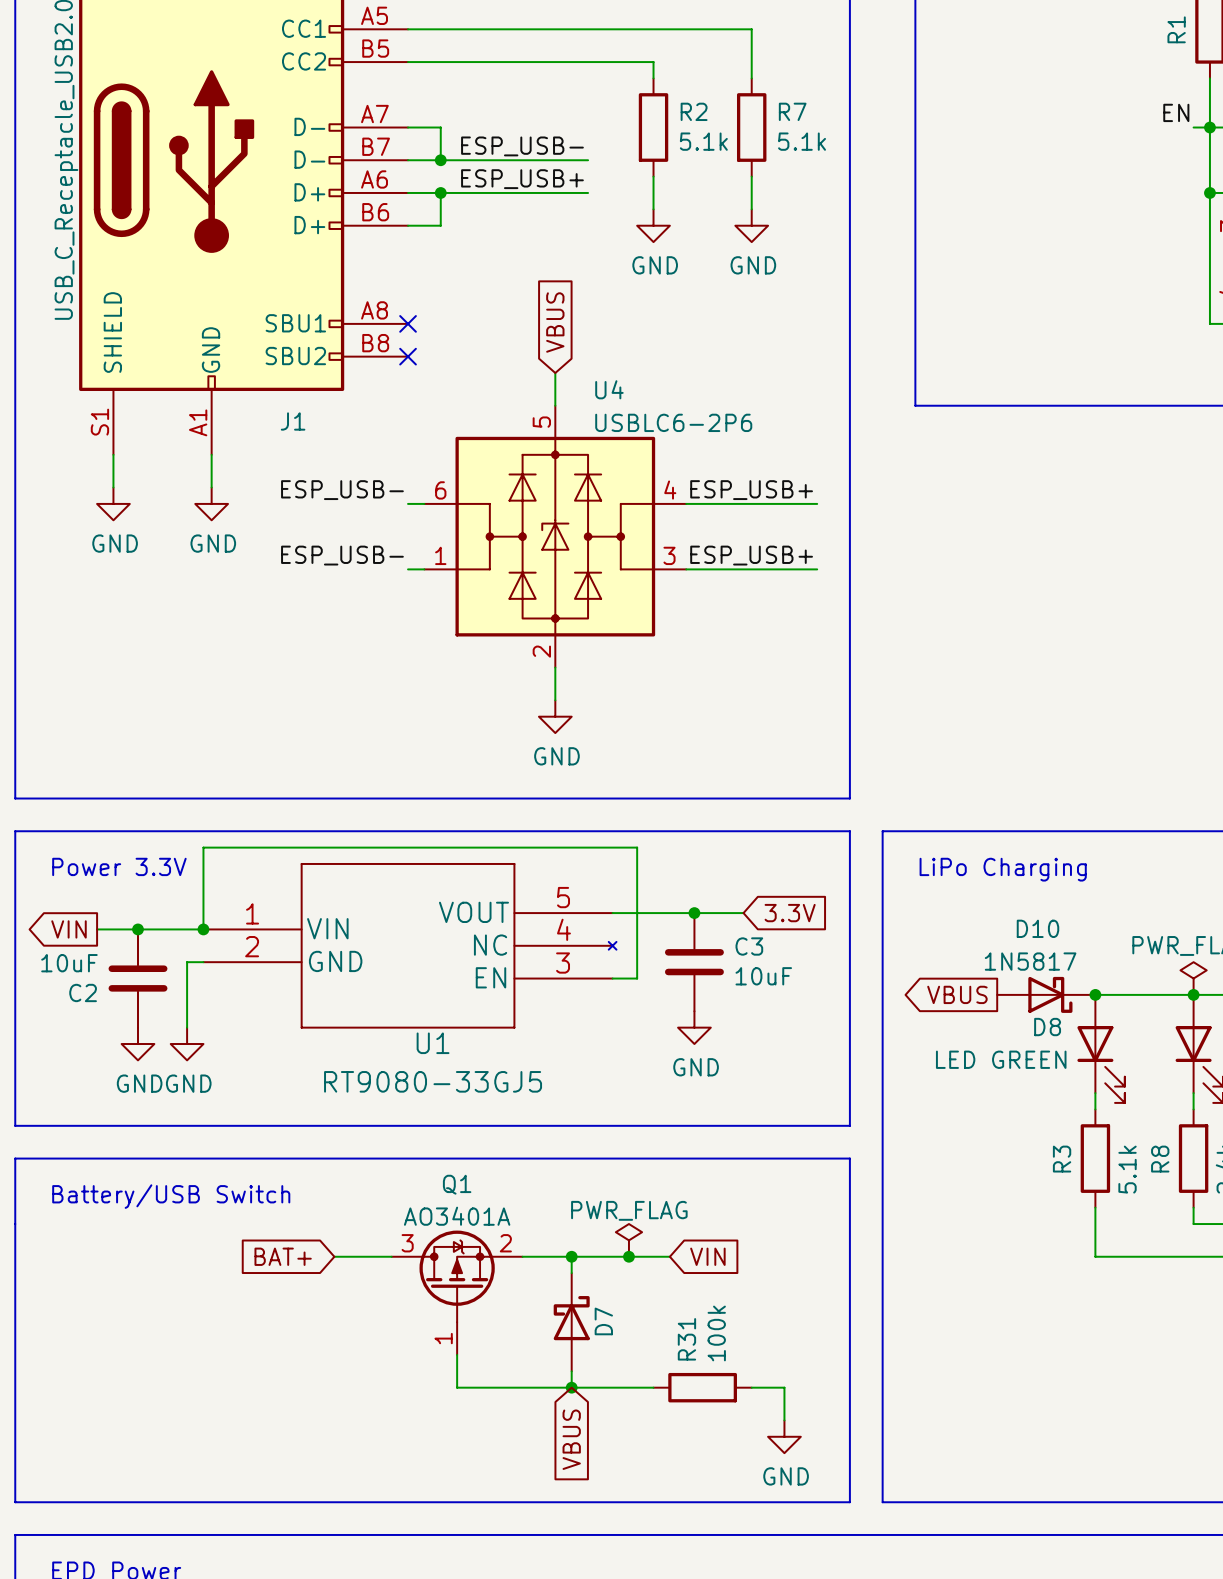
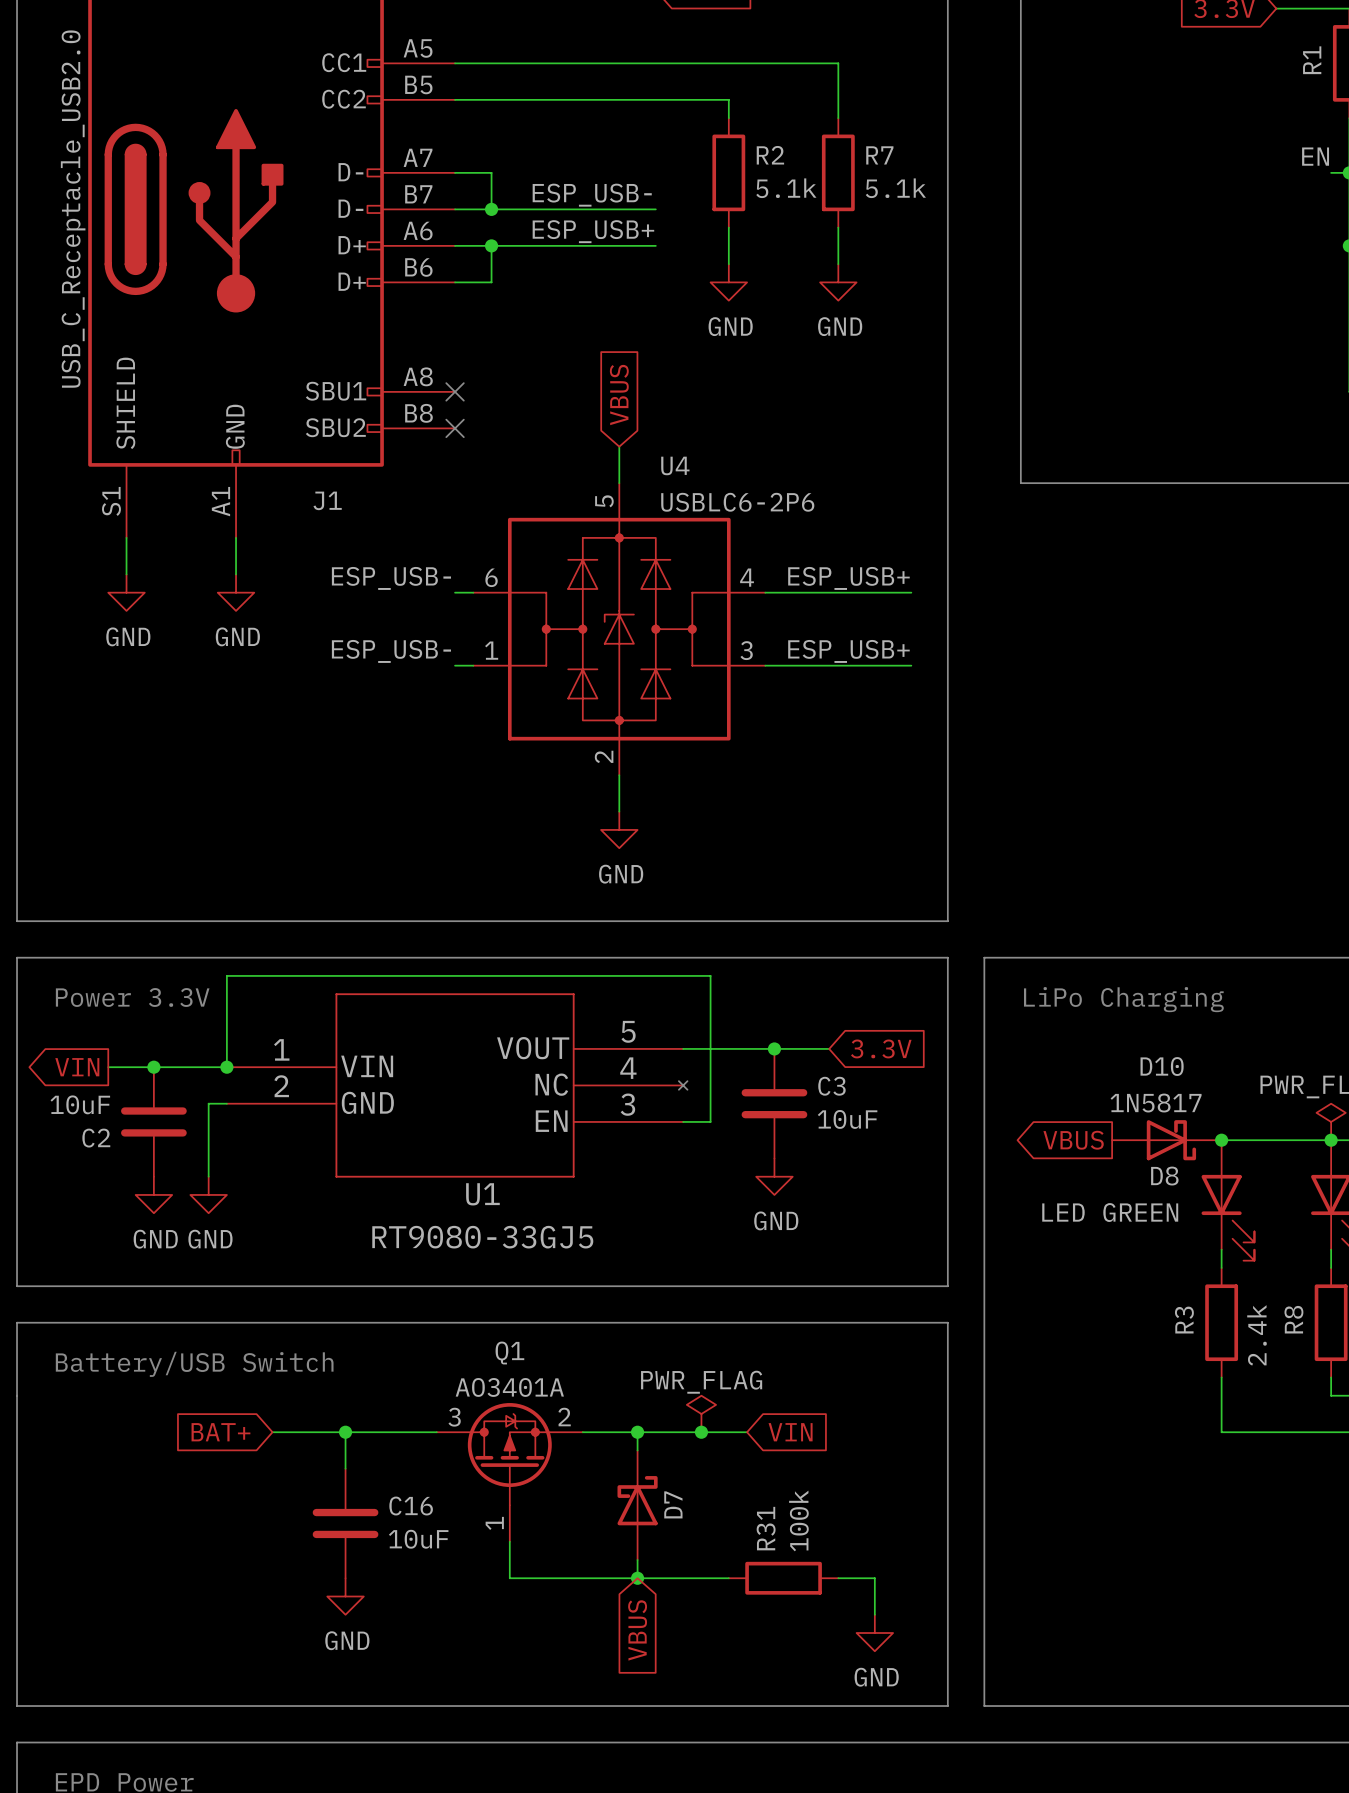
R3 value: 5.1k (1127, 1169) -> 2.4k (1257, 1335)
wire: none -> (272, 1432) (372, 1432)
global label position: BAT+ (283, 1256) -> BAT+ (220, 1432)
wire: none -> (345, 1432) (345, 1468)
junction: none -> (345, 1432)
C16: none -> 10uF (345, 1523)
power symbol: none -> GND (345, 1596)

